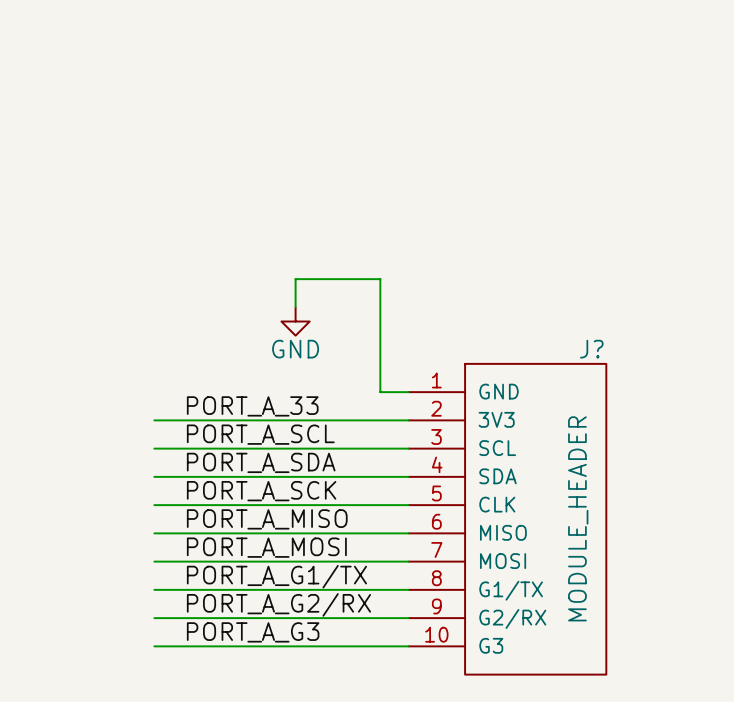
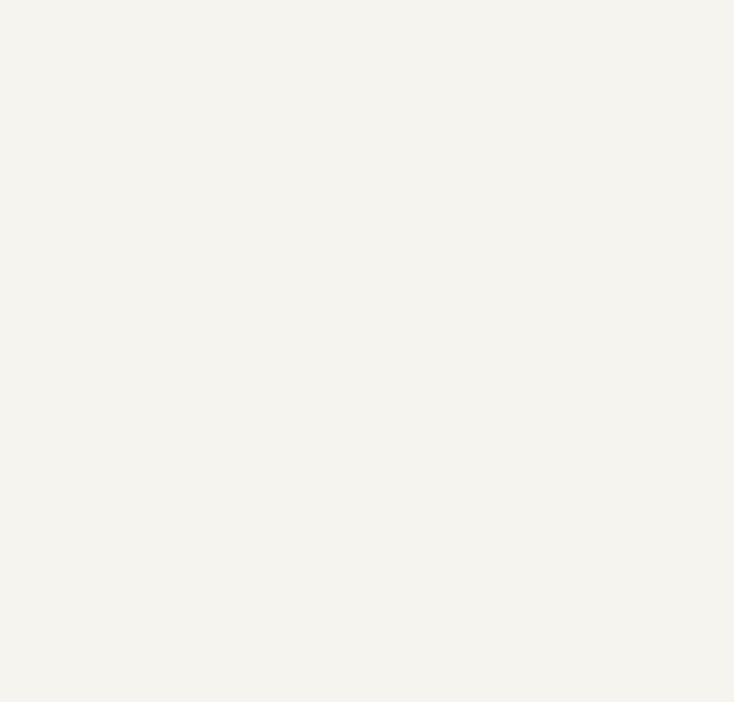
wire: (295, 307) (295, 279) (380, 279) (380, 392) (408, 392) -> none
power symbol: GND (295, 321) -> none
label: PORT_A_33 (252, 406) -> none
wire: (154, 420) (408, 420) -> none
label: PORT_A_SCL (260, 434) -> none
wire: (154, 448) (408, 448) -> none
label: PORT_A_SDA (261, 462) -> none
wire: (154, 476) (408, 476) -> none
label: PORT_A_SCK (261, 491) -> none
wire: (154, 505) (408, 505) -> none
label: PORT_A_MISO (267, 519) -> none
J?: MODULE_HEADER (507, 519) -> none
wire: (154, 533) (408, 533) -> none
label: PORT_A_MOSI (266, 547) -> none
wire: (154, 561) (408, 561) -> none
label: PORT_A_G1/TX (276, 576) -> none
wire: (154, 589) (408, 589) -> none
label: PORT_A_G2/RX (278, 604) -> none
wire: (154, 618) (408, 618) -> none
label: PORT_A_G3 (253, 632) -> none
wire: (154, 646) (408, 646) -> none

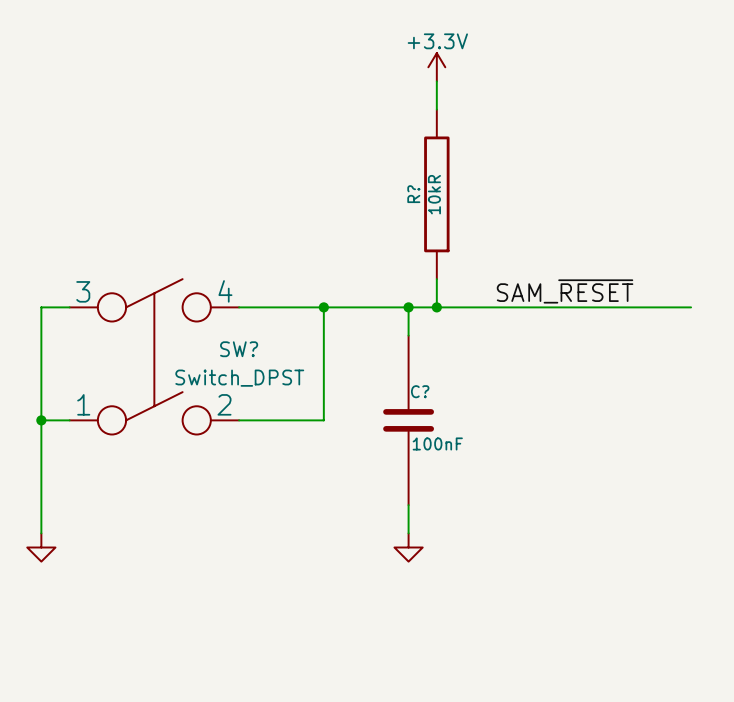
power symbol: none -> +3.3V (436, 67)
wire: none -> (436, 81) (436, 109)
R?: none -> 10kR (436, 194)
wire: none -> (436, 279) (436, 307)
label: none -> SAM_~{RESET} (565, 291)
wire: none -> (69, 307) (41, 307) (41, 533)
wire: none -> (239, 307) (691, 307)
wire: none -> (323, 307) (323, 420) (239, 420)
junction: none -> (323, 307)
wire: none -> (408, 307) (408, 335)
junction: none -> (408, 307)
junction: none -> (436, 307)
SW?: none -> Switch_DPST (154, 356)
wire: none -> (41, 420) (69, 420)
junction: none -> (41, 420)
C?: none -> 100nF (408, 420)
wire: none -> (408, 505) (408, 533)
power symbol: none -> (41, 547)
power symbol: none -> (408, 547)

